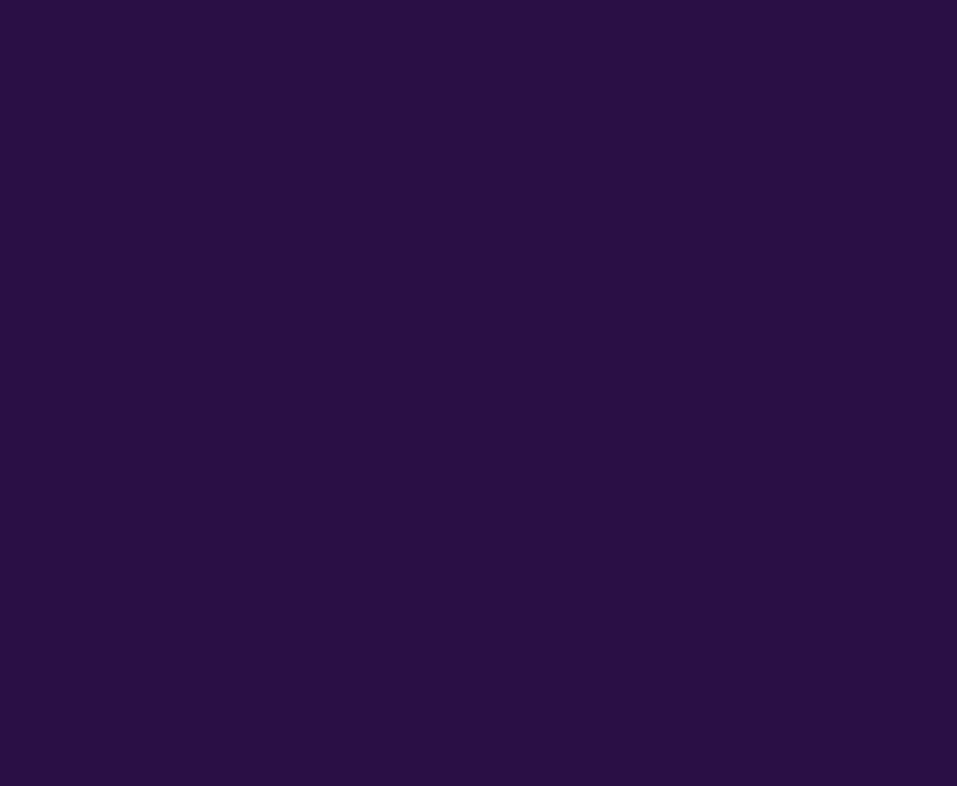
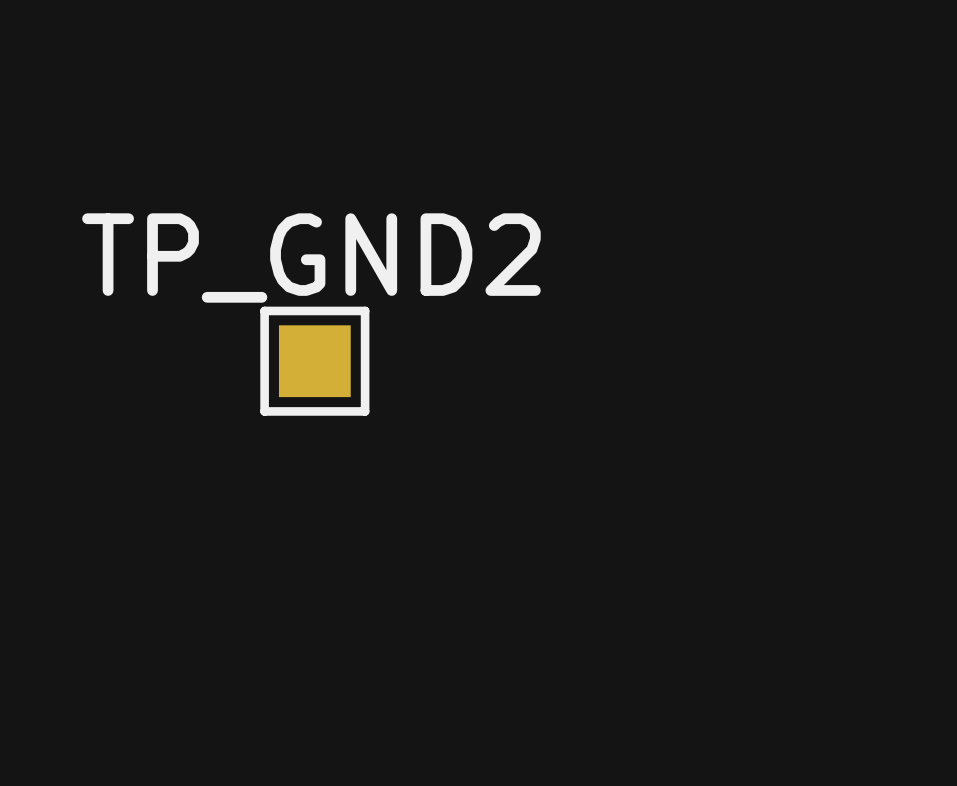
TP_GND2: none -> (314, 361)

